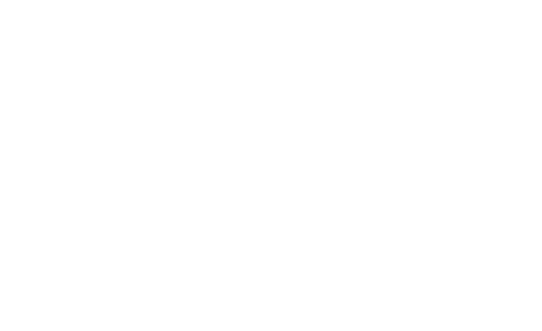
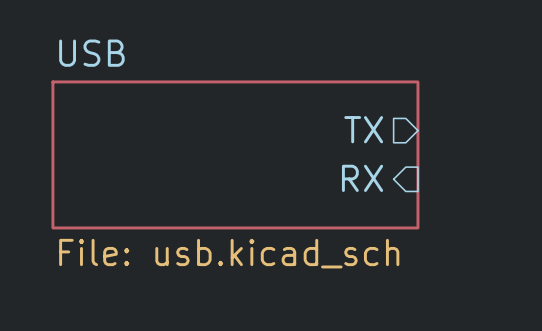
sheet pin: none -> TX (363, 129)
sheet USB: none -> File: usb.kicad_sch (235, 154)
sheet pin: none -> RX (362, 178)

